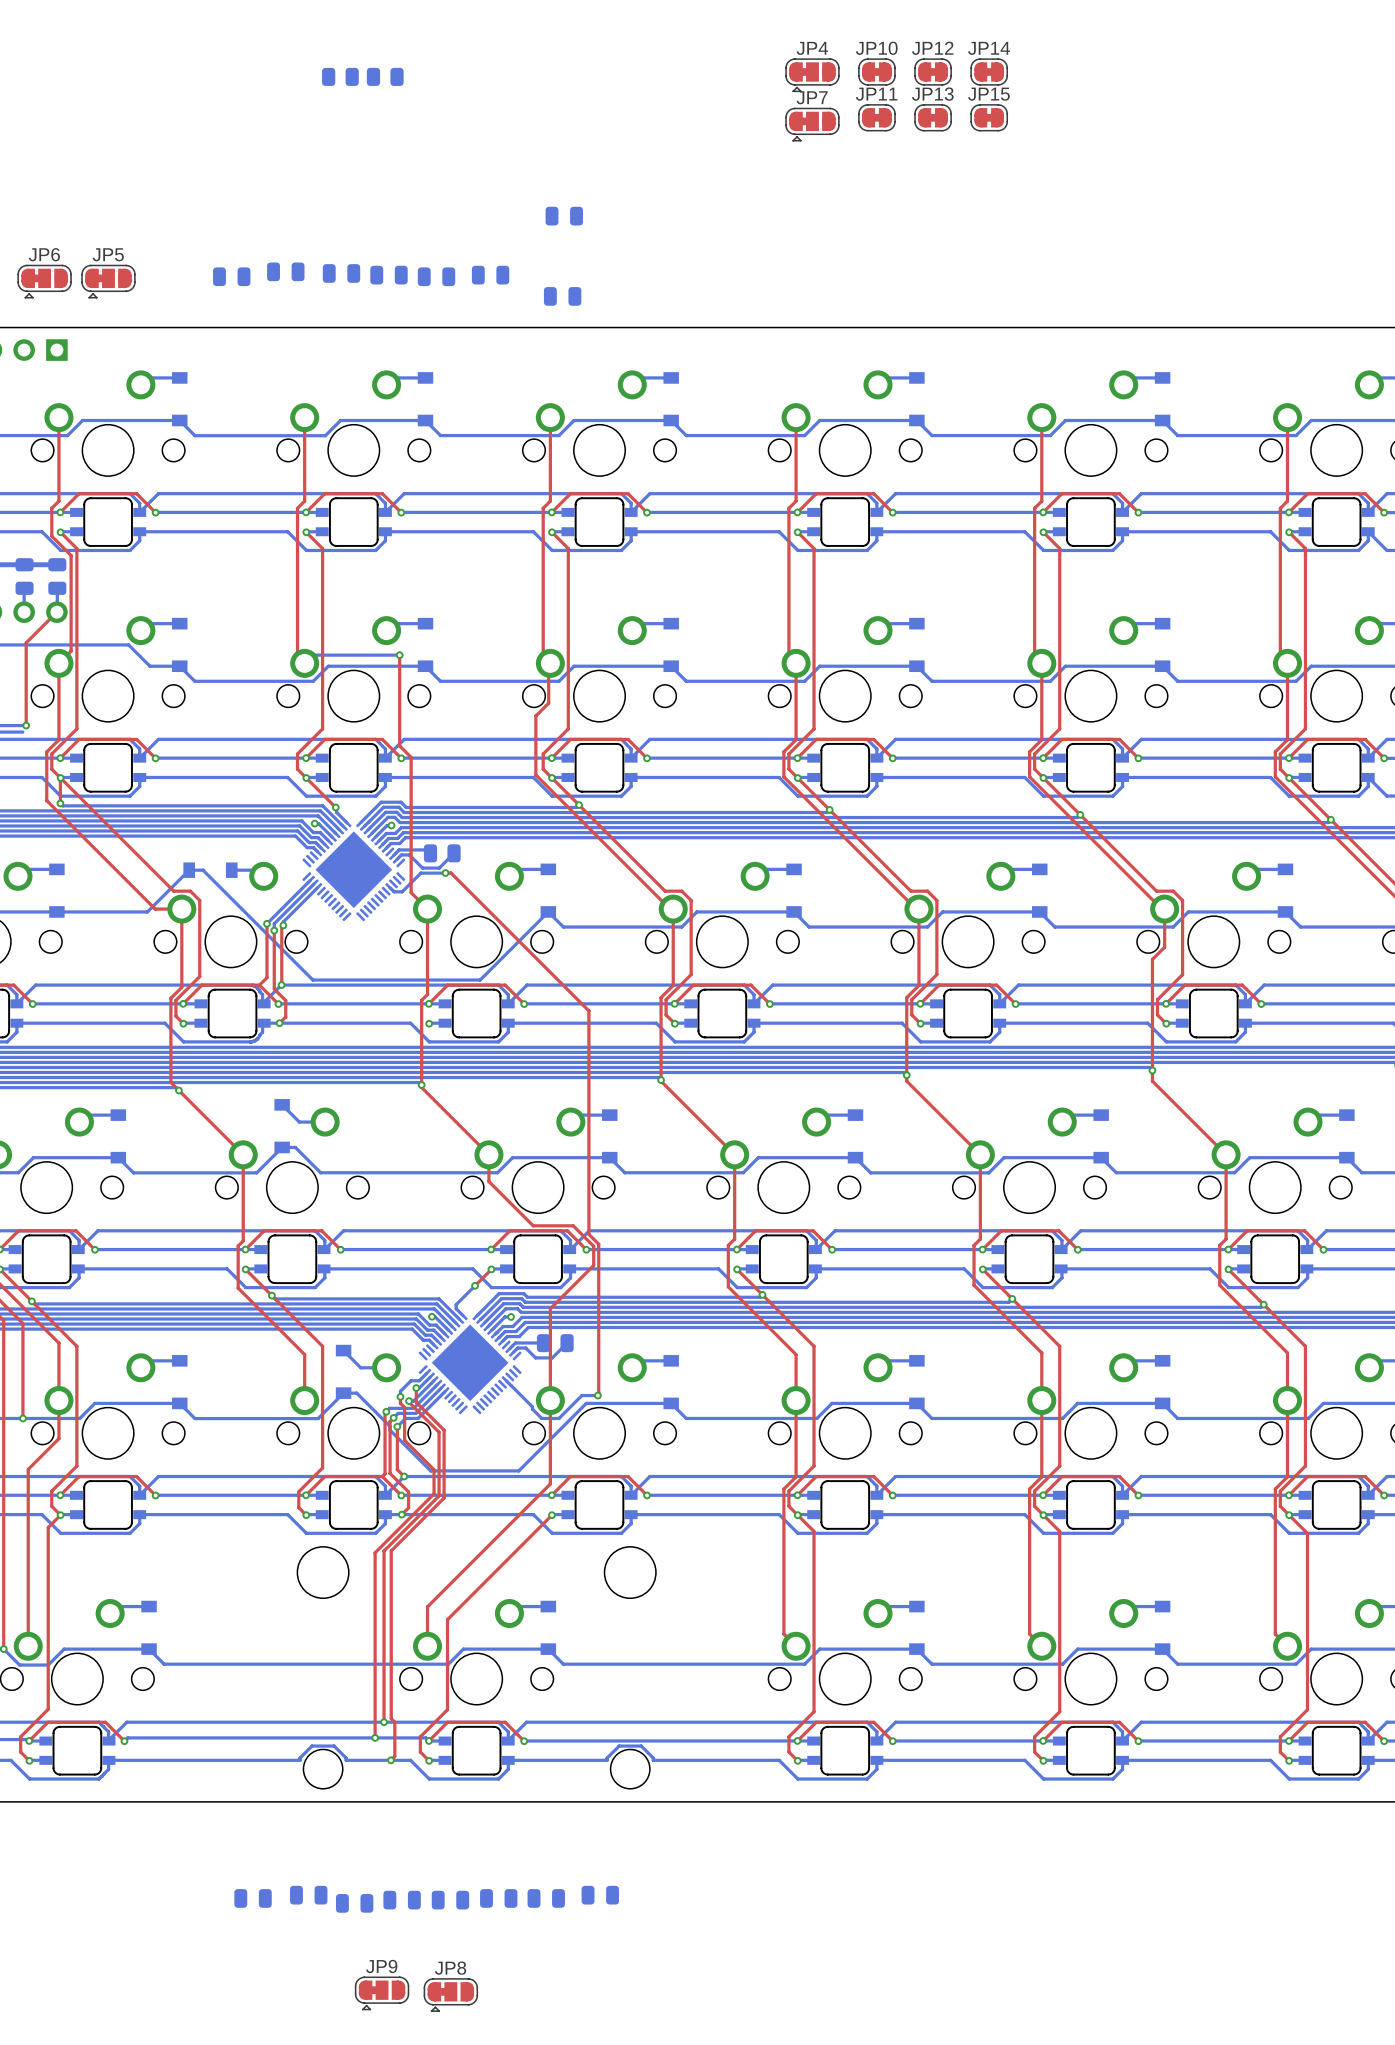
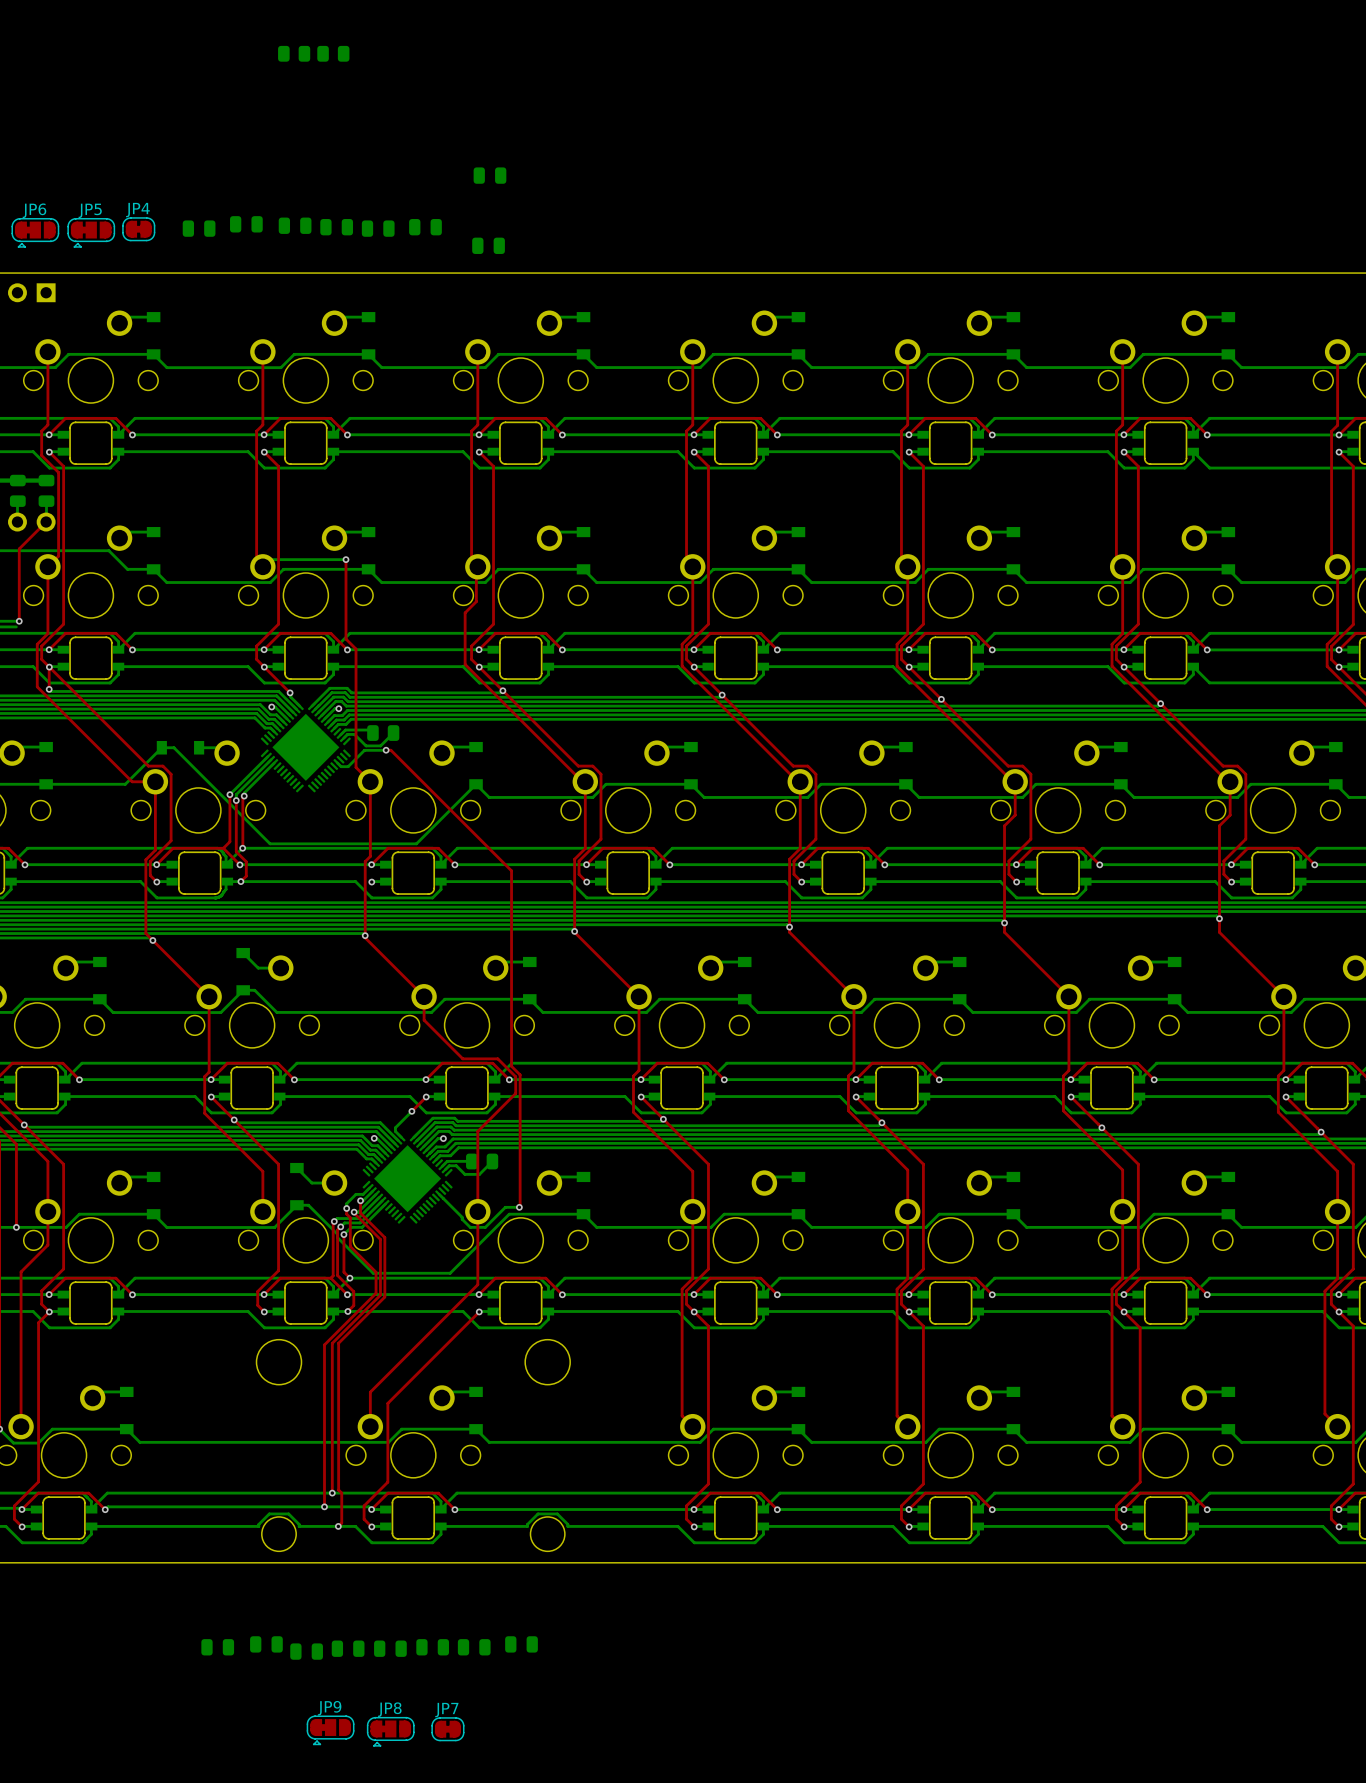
JP4 footprint: [785, 58, 840, 93] -> [122, 217, 156, 242]
JP10: (876, 71) -> none
JP12: (933, 71) -> none
JP14: (989, 71) -> none
JP7 footprint: [785, 107, 840, 142] -> [431, 1717, 465, 1742]
JP11: (876, 117) -> none
JP13: (933, 117) -> none
JP15: (989, 117) -> none

